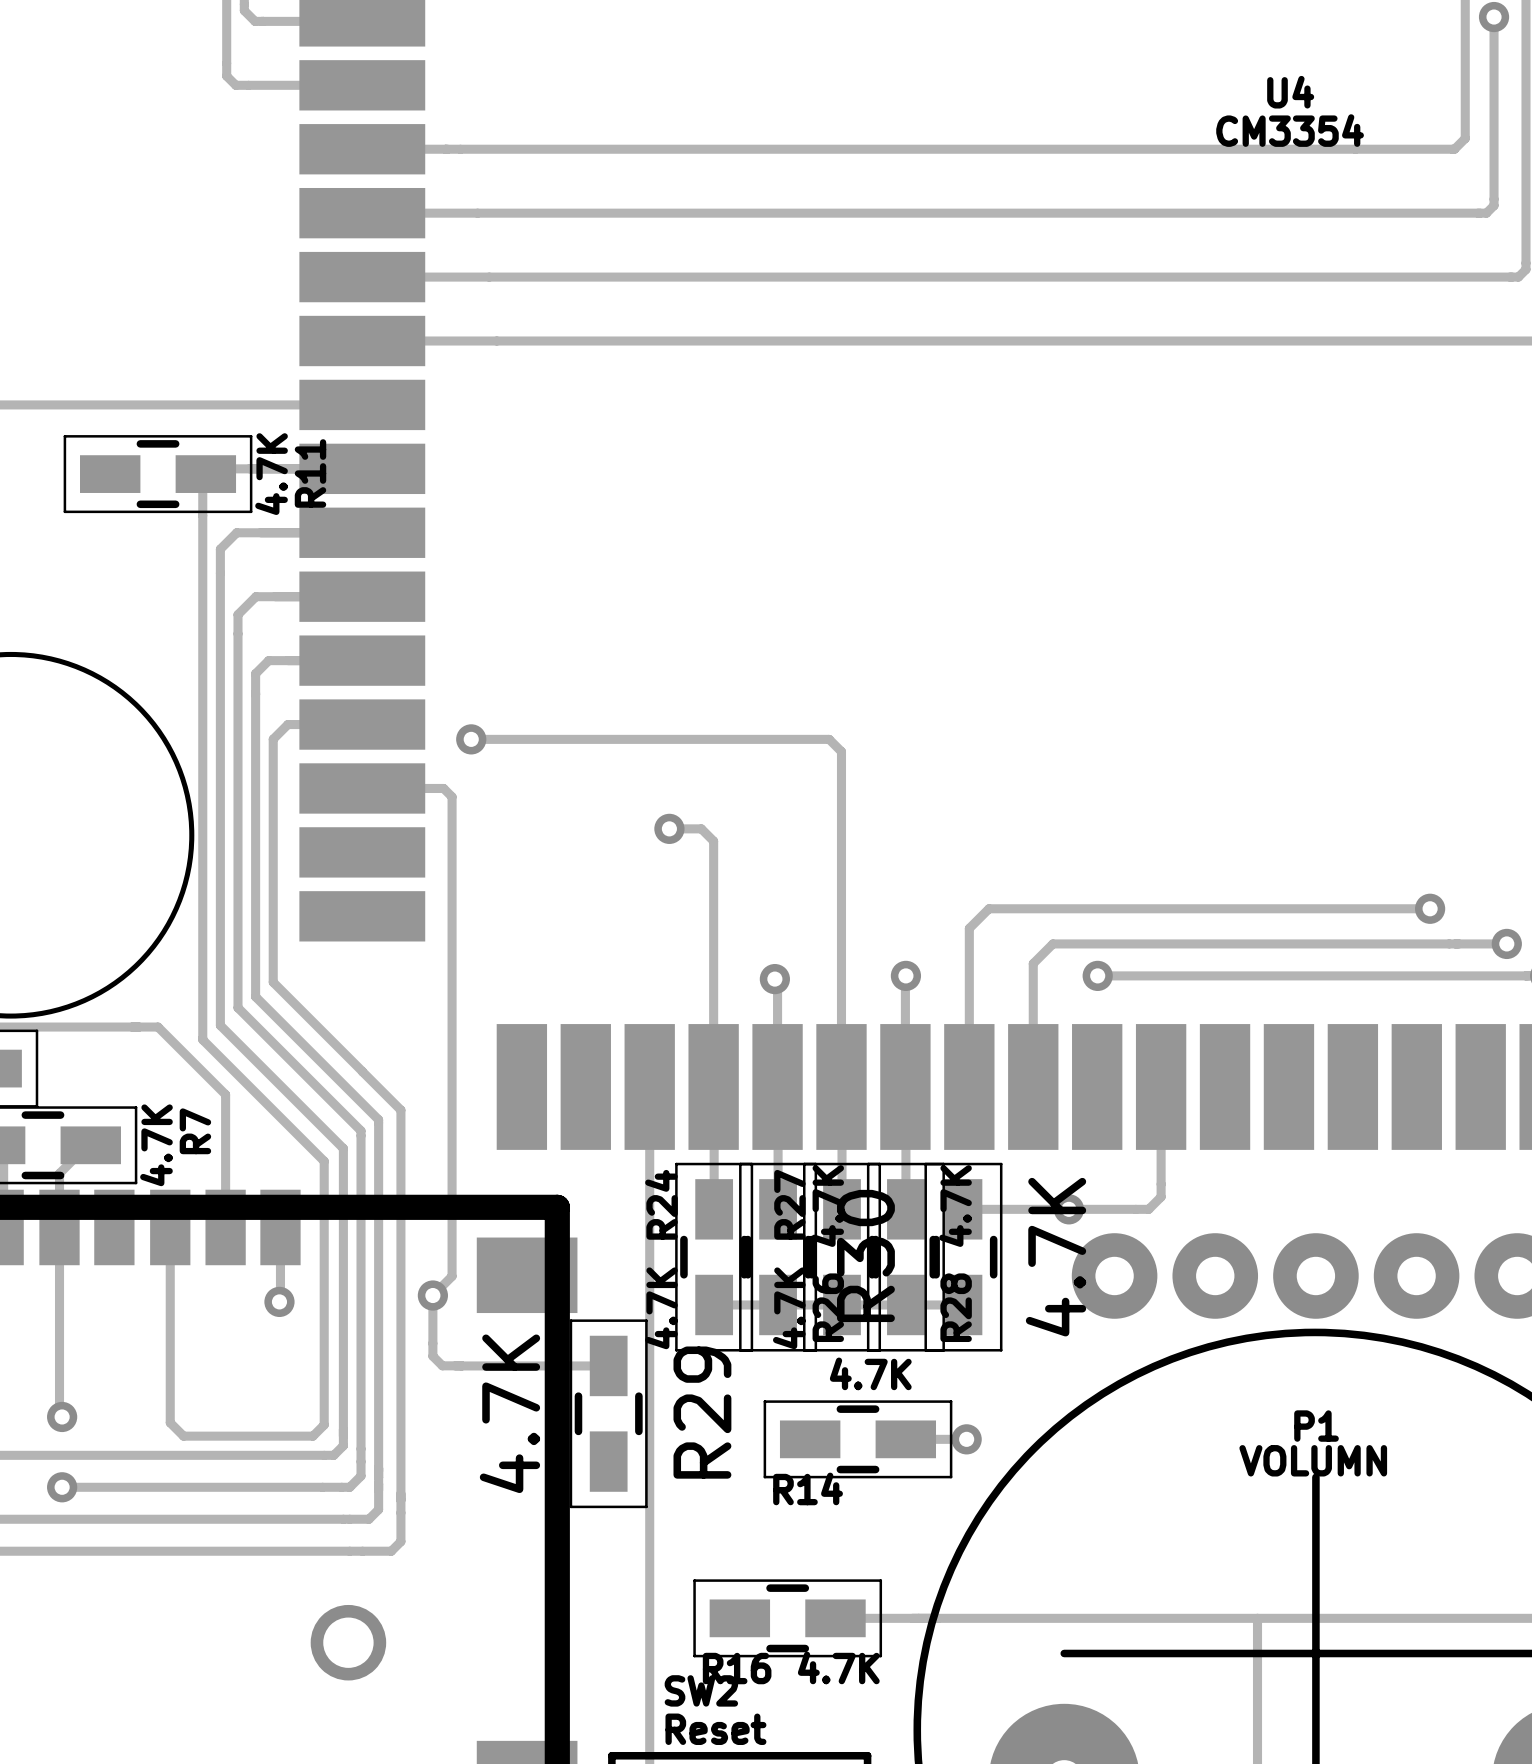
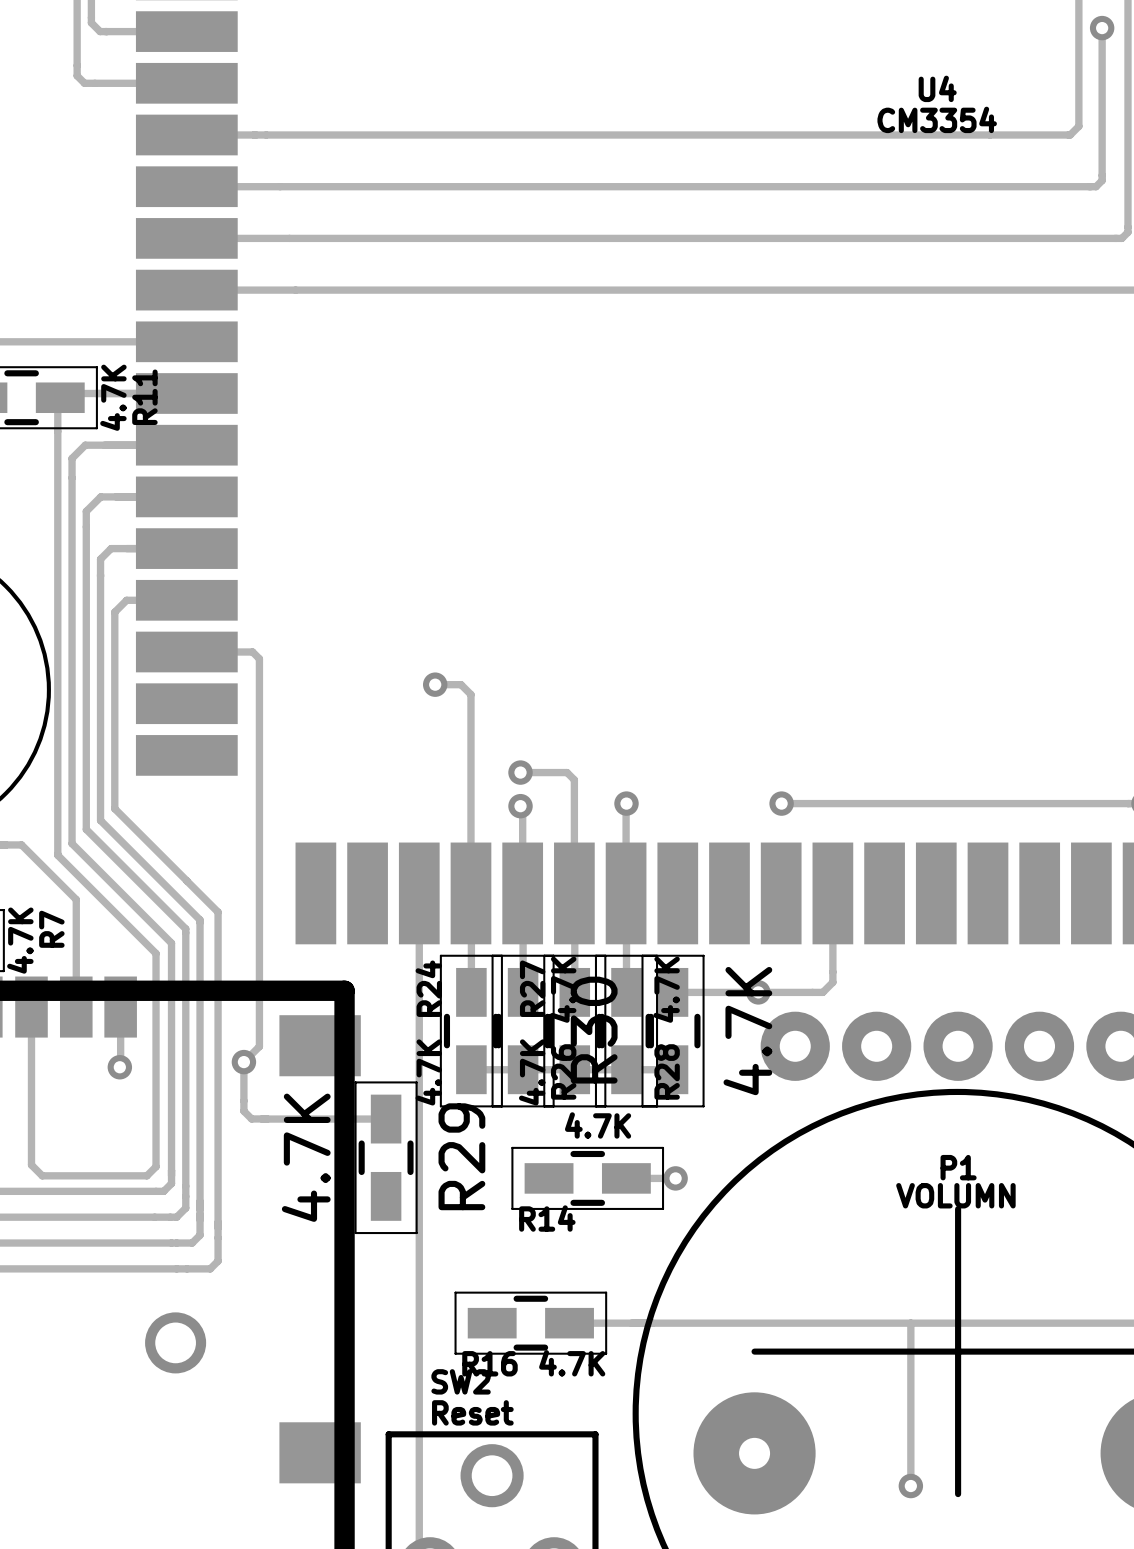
track: (471, 739) (829, 739) (841, 751) (841, 946) -> (520, 772) (567, 772) (574, 779)
via: (471, 739) -> none
track: (1430, 908) (989, 908) (969, 928) (969, 1086) -> none
via: (1430, 908) -> none
via: none -> (520, 772)
track: (1506, 943) (1052, 943) (1033, 963) (1033, 1086) -> none
via: (1506, 943) -> none

